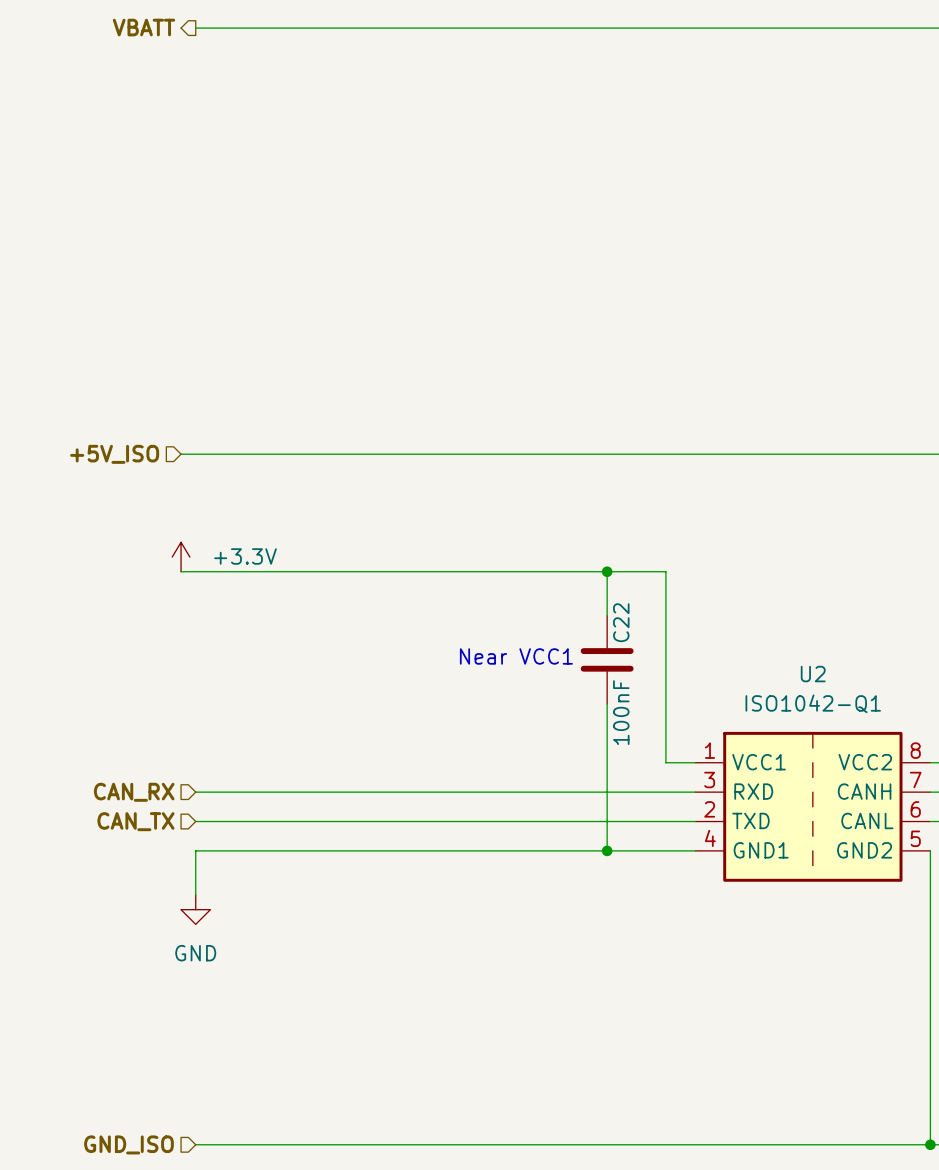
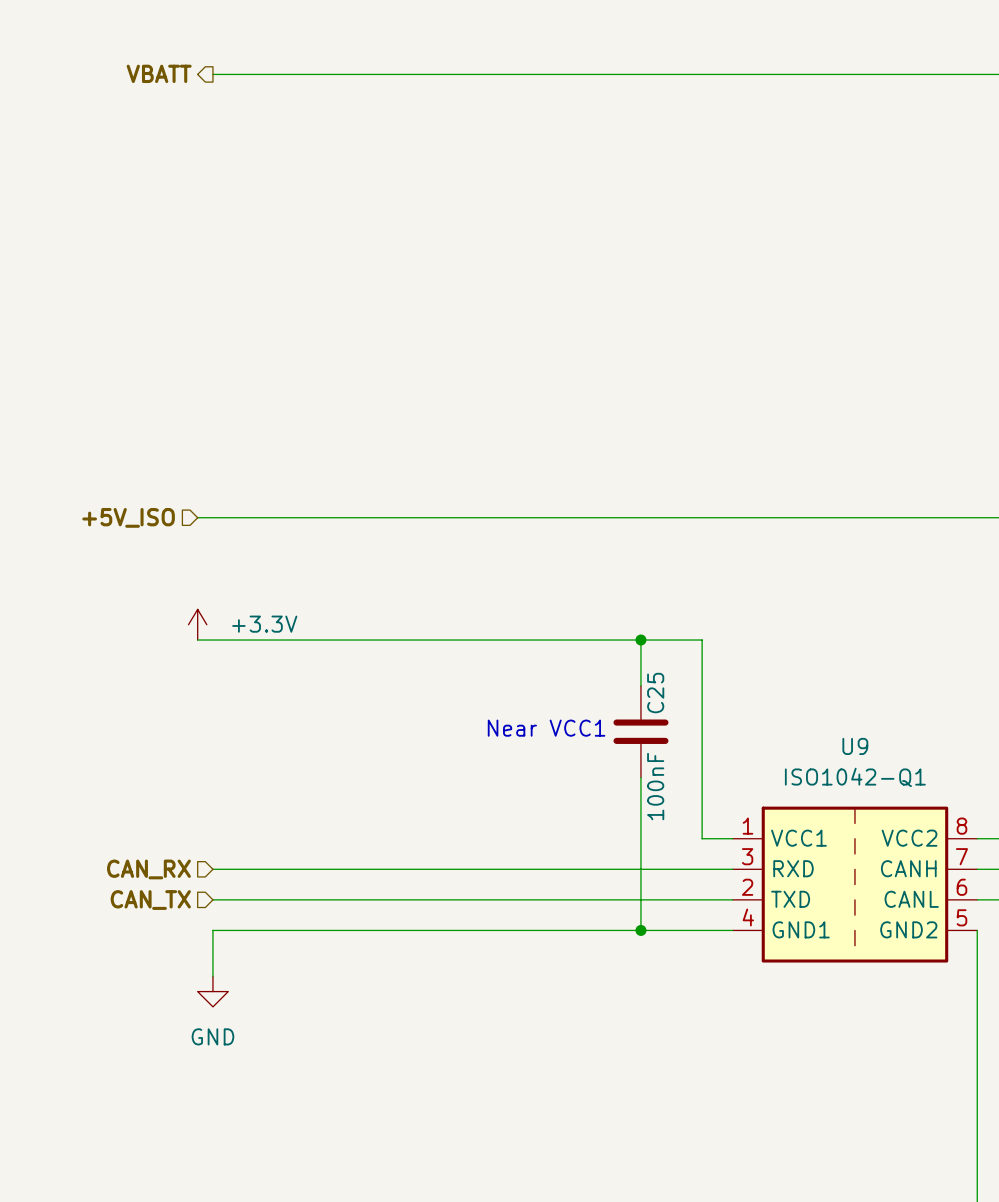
C22 name: C22 (621, 622) -> C25 (655, 693)
U2 name: U2 (813, 674) -> U9 (855, 746)

